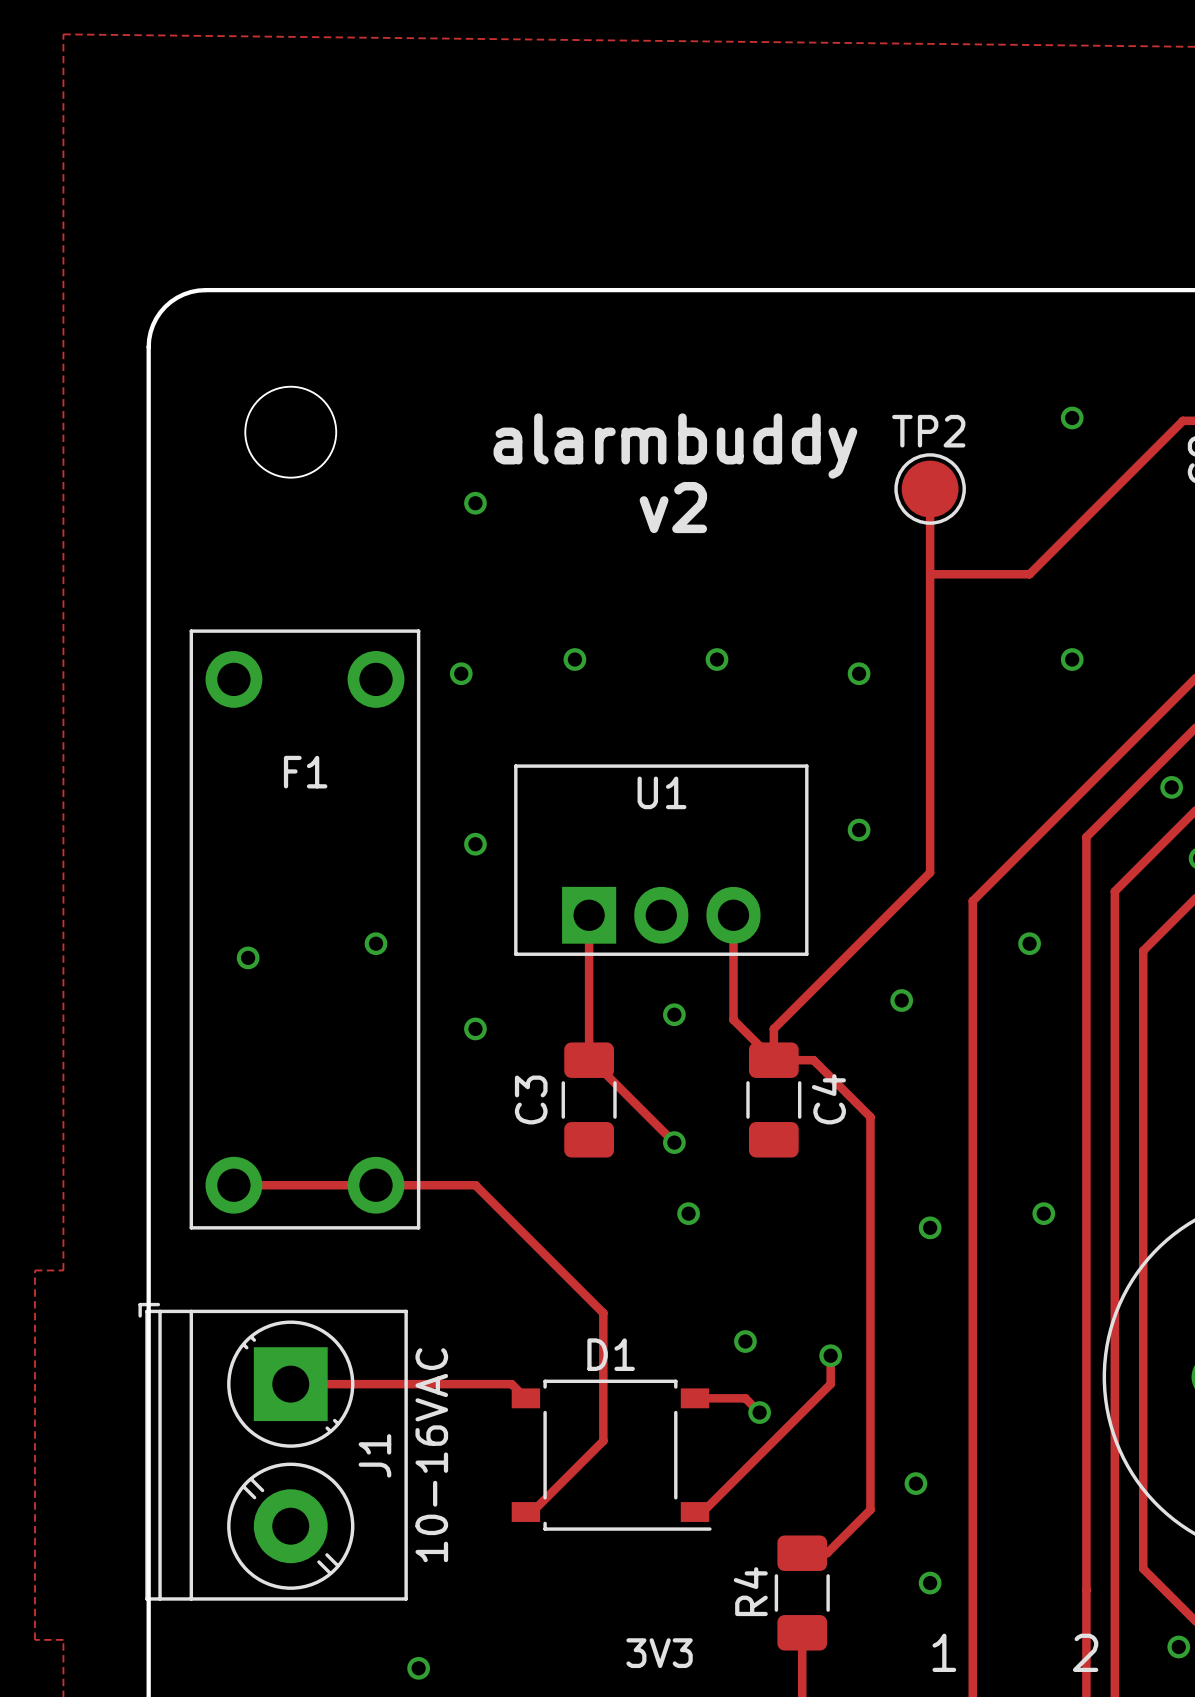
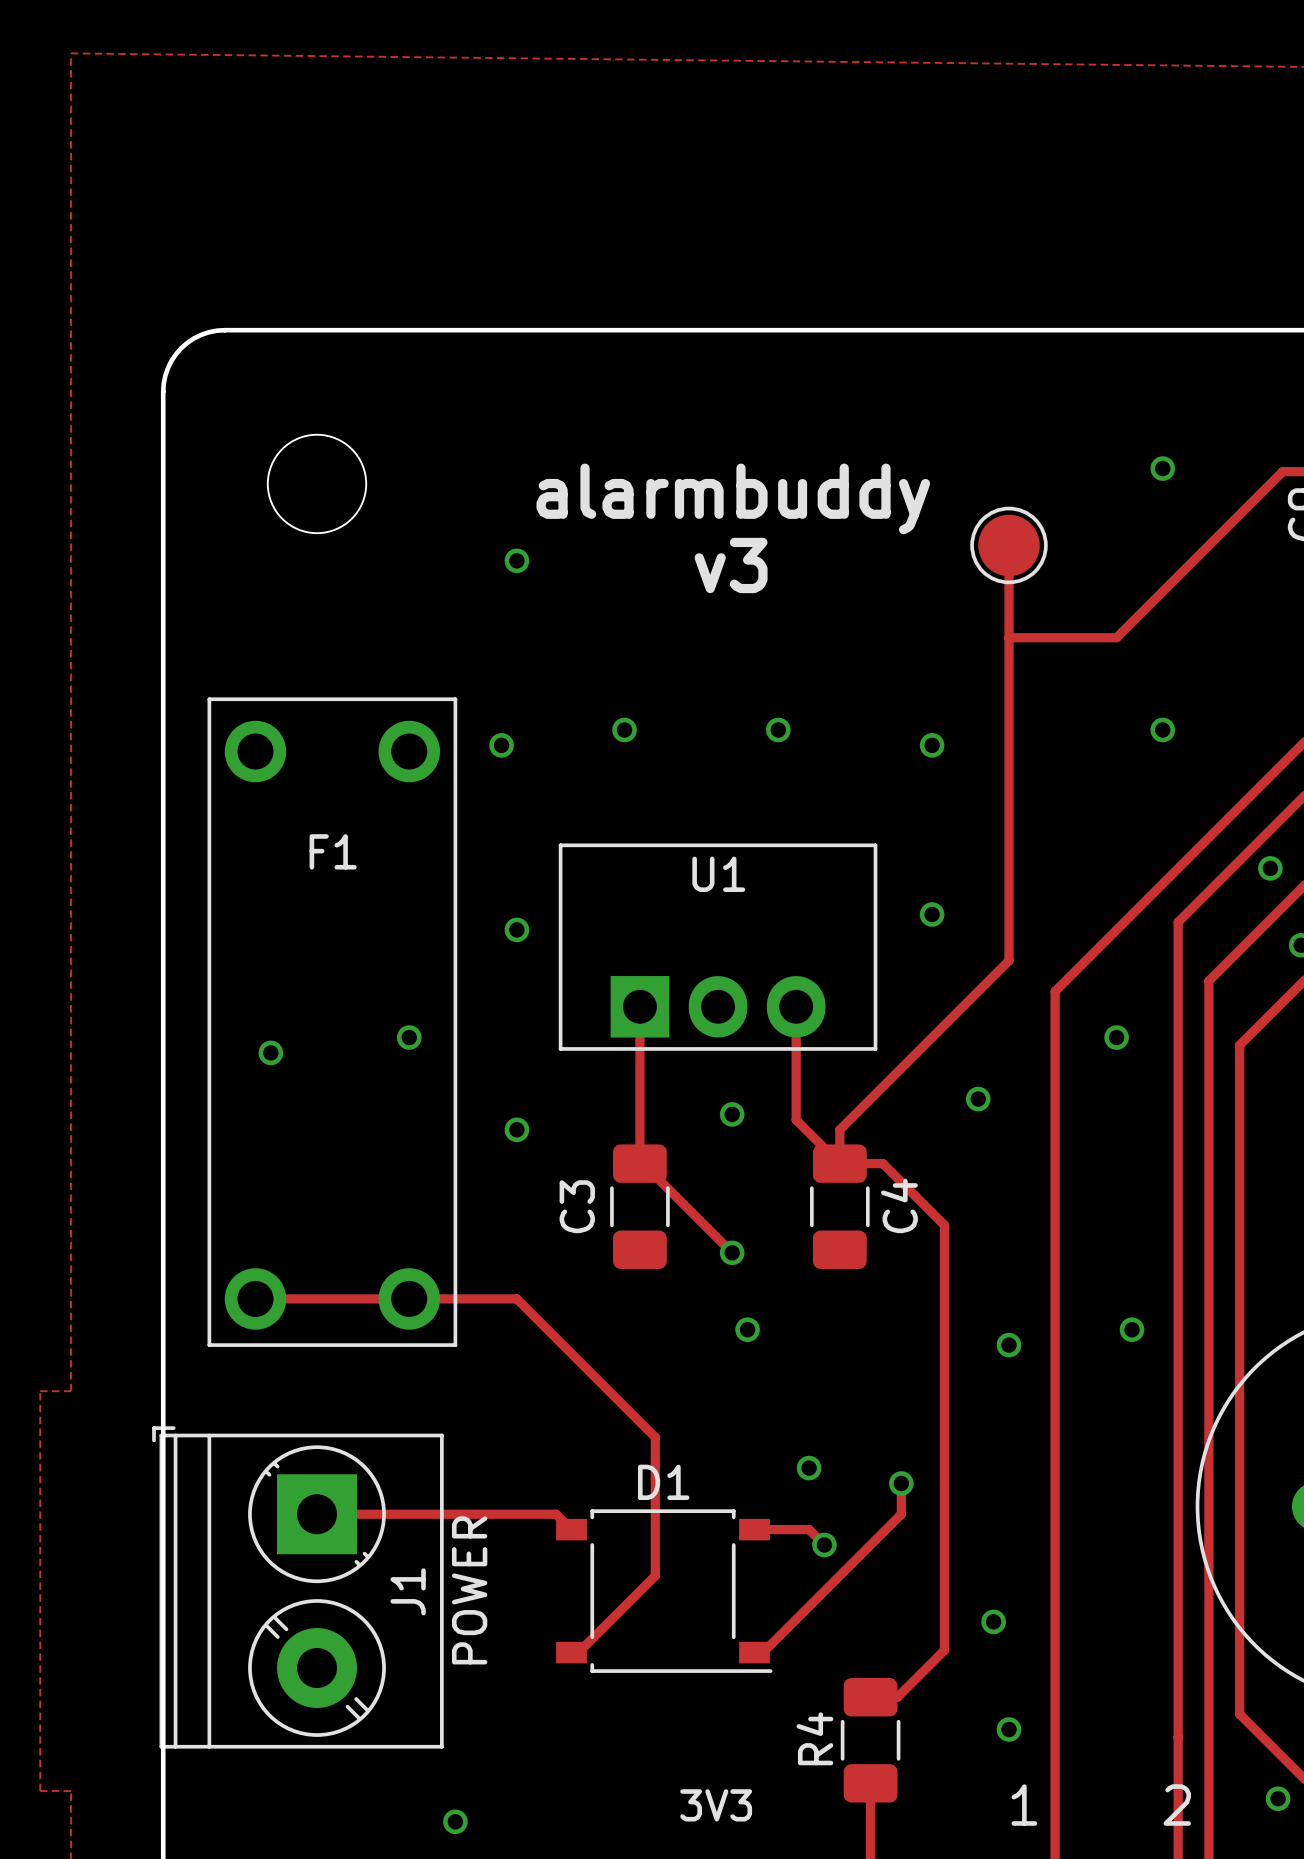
TP2 name: TP2 (928, 431) -> none
text: v2 (673, 507) -> v3 (731, 565)
J1 value: 10-16VAC (431, 1455) -> POWER (469, 1590)

